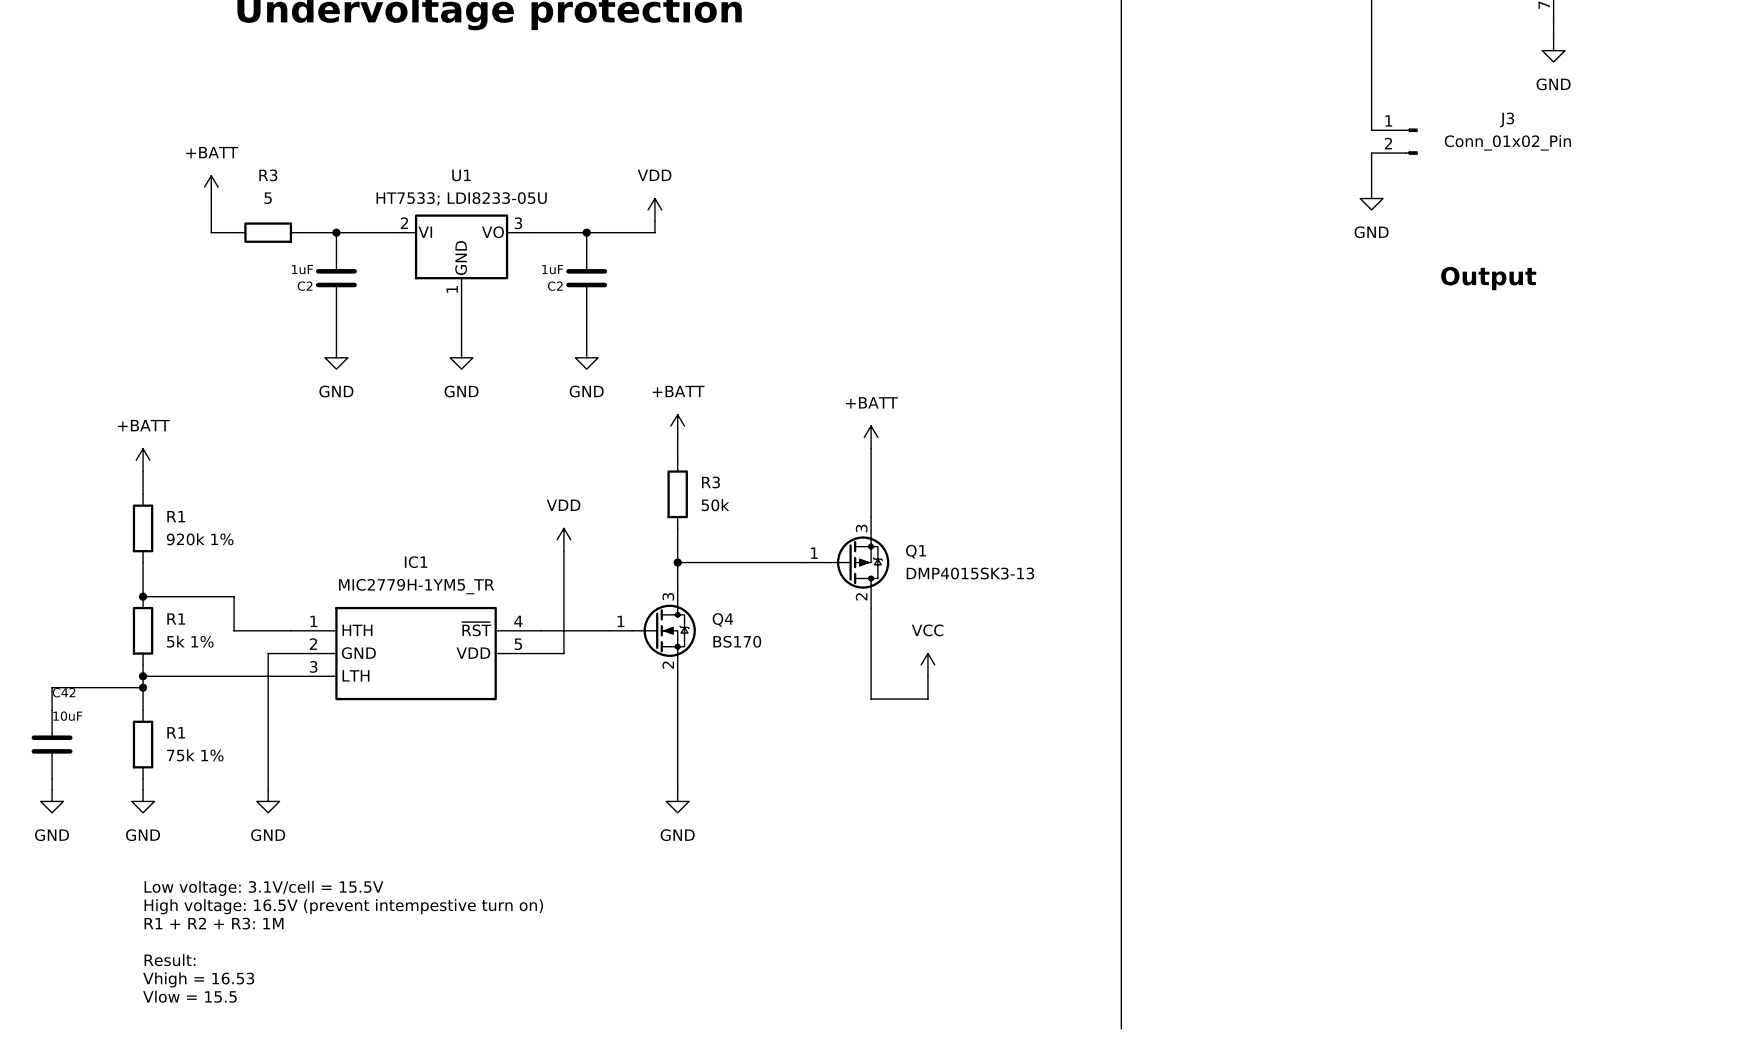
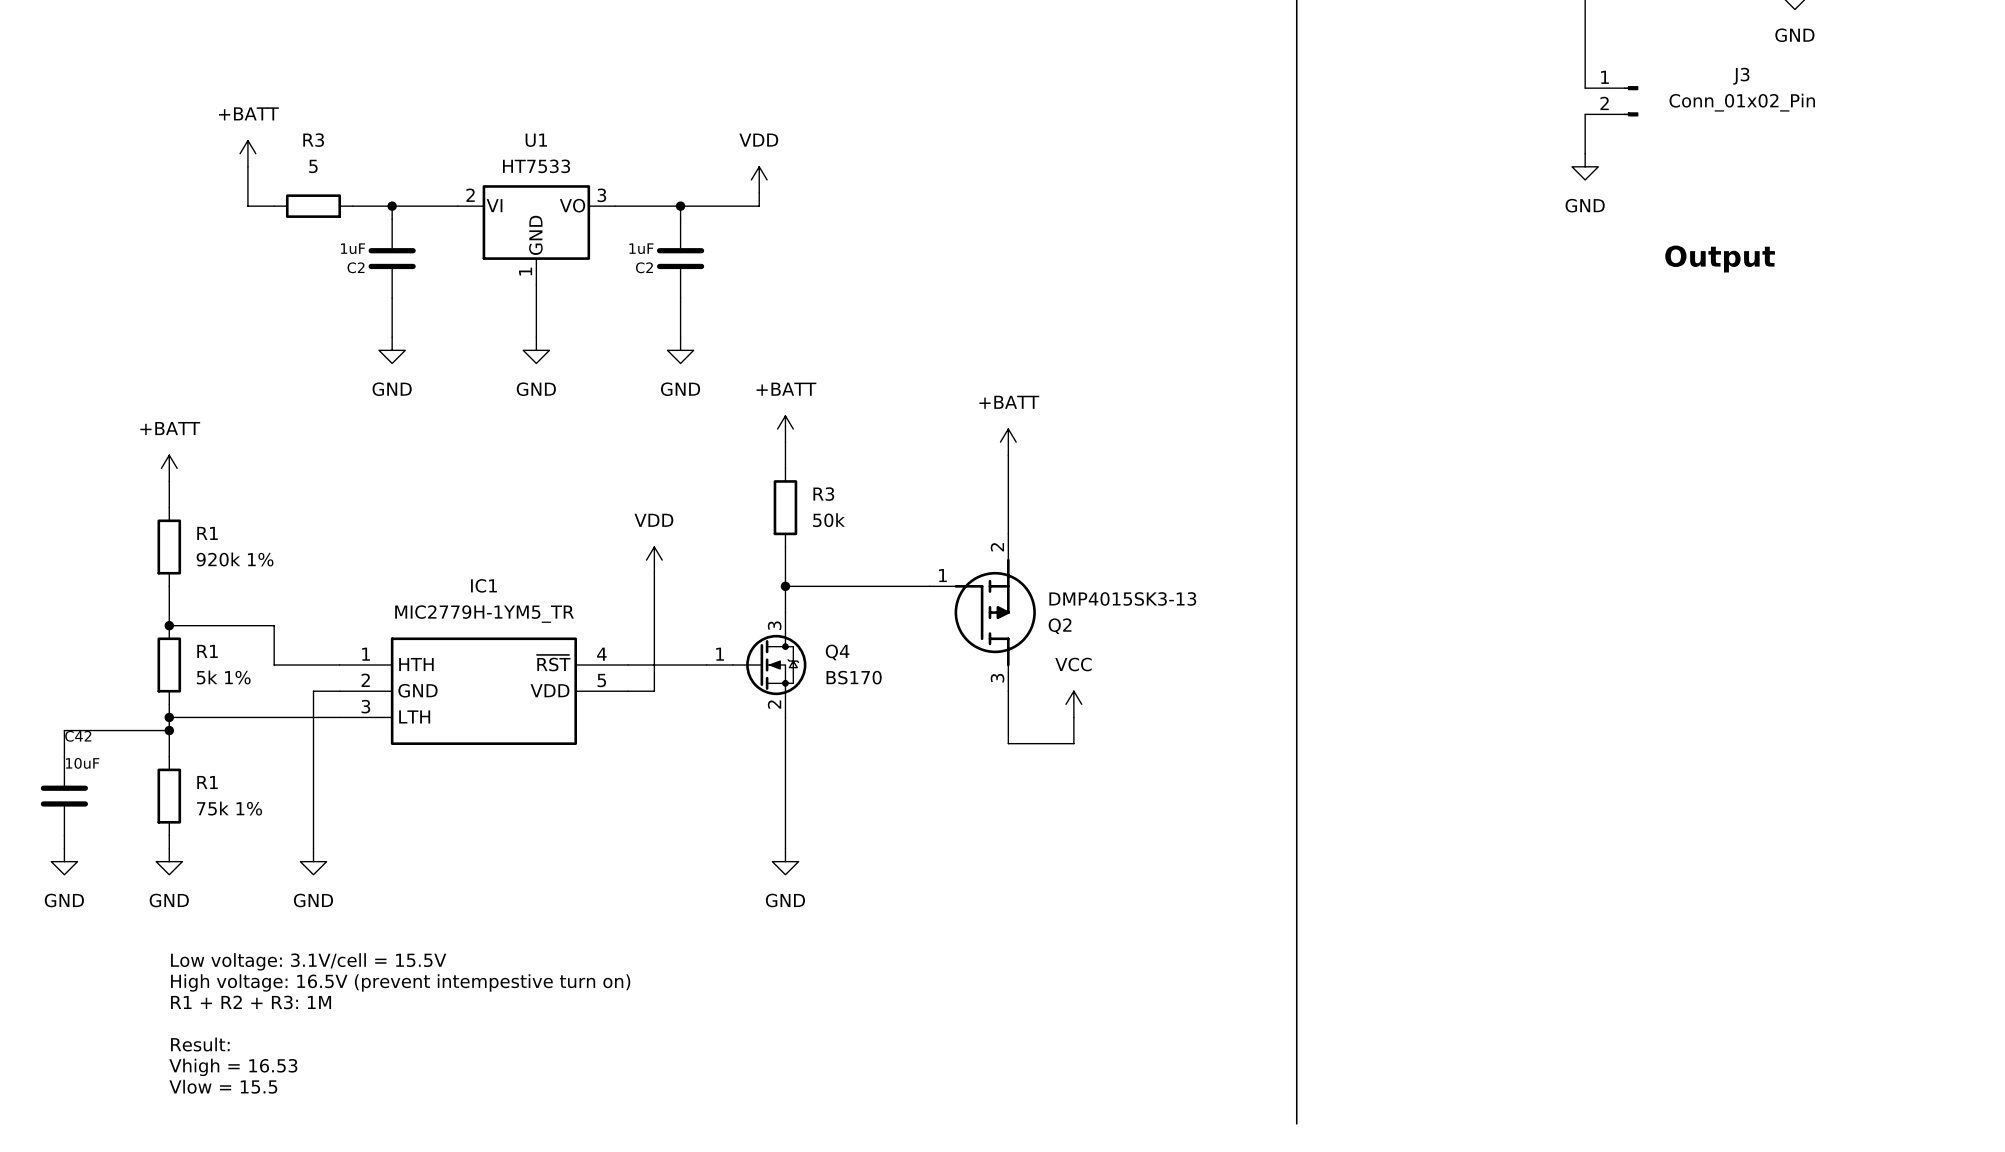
U1 value: HT7533; LDI8233-05U (461, 198) -> HT7533 (536, 166)
Q1: DMP4015SK3-13 (846, 562) -> none
Q2: none -> DMP4015SK3-13 (982, 612)

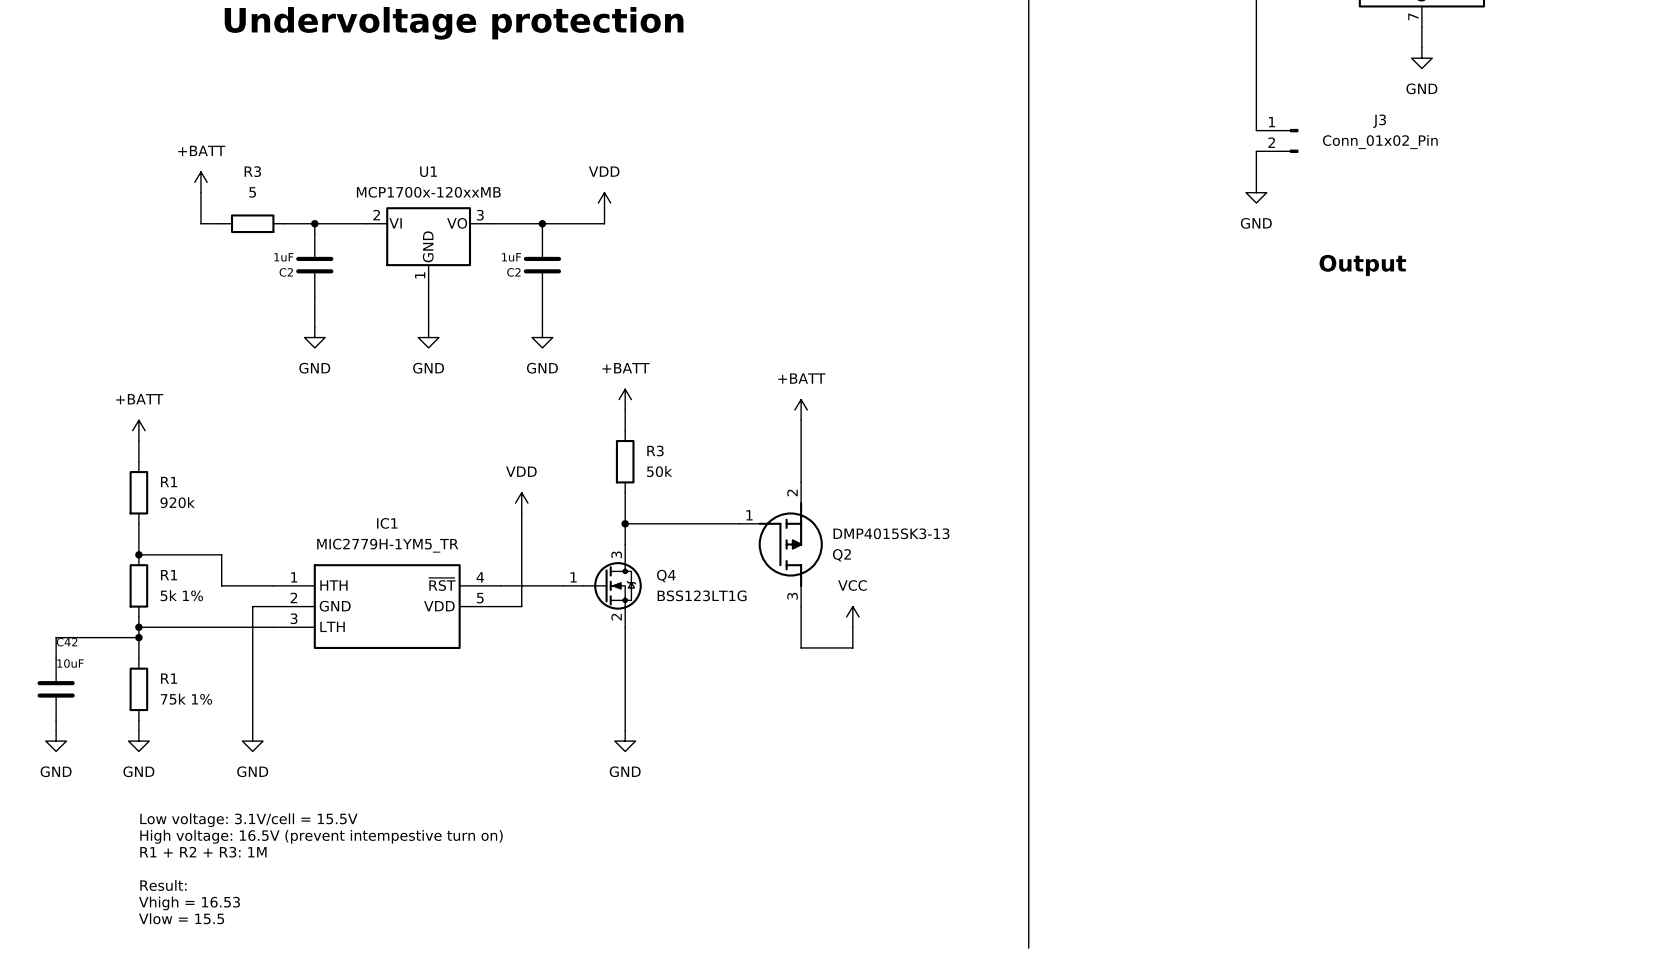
U1 value: HT7533 (536, 166) -> MCP1700x-120xxMB (428, 192)
R1 value: 920k 1% (235, 559) -> 920k (177, 502)
Q4 value: BS170 (854, 677) -> BSS123LT1G (702, 595)

